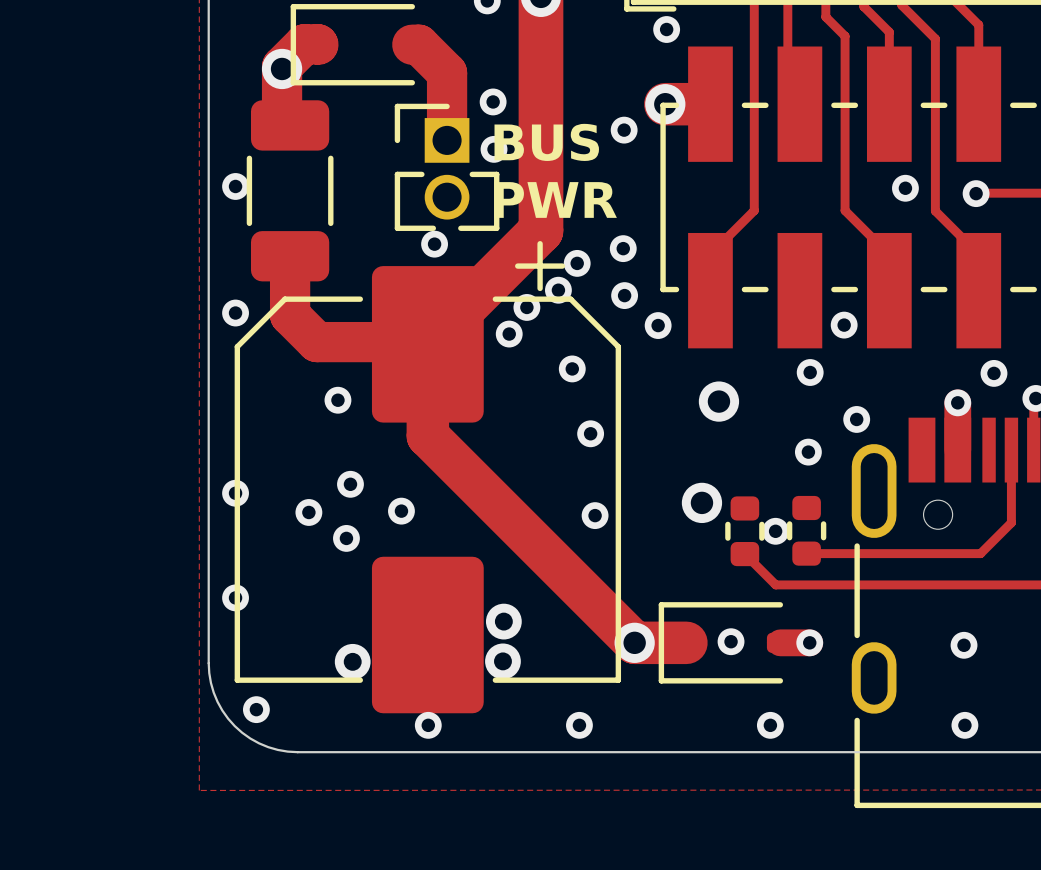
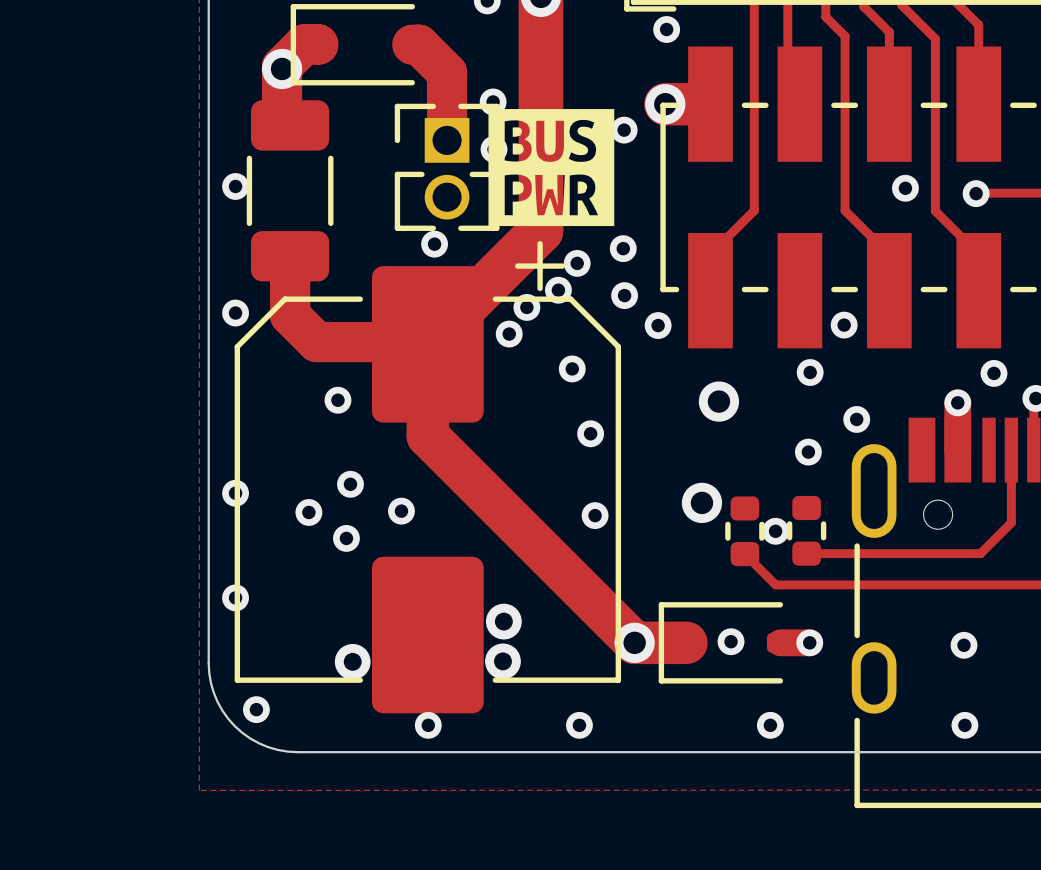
part footprint: [394, 103, 500, 231] -> [394, 103, 500, 231]
drawing: none -> [488, 109, 615, 227]
text: BUS (546, 142) -> none
text: PWR (555, 199) -> none

